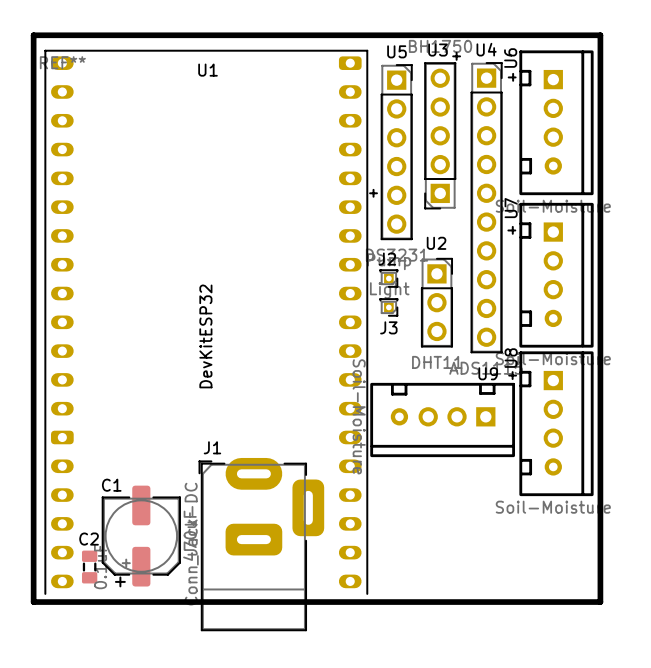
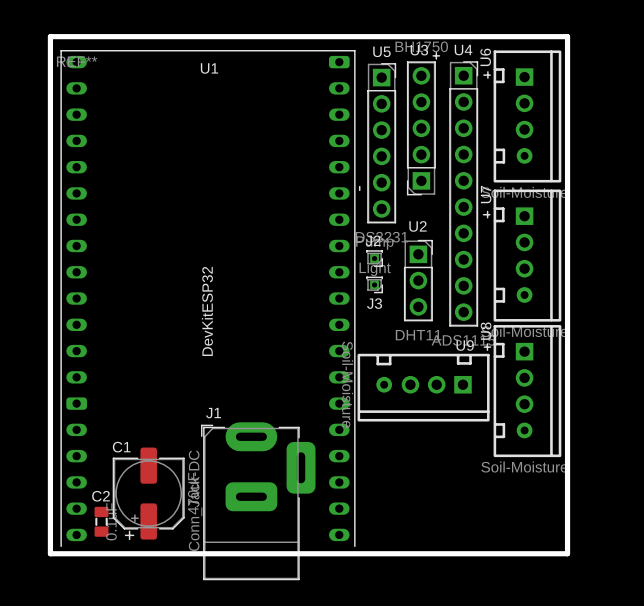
line: (373, 189) (373, 196) -> none
line: (370, 193) (376, 193) -> none
line: none -> (359, 186) (359, 190)

